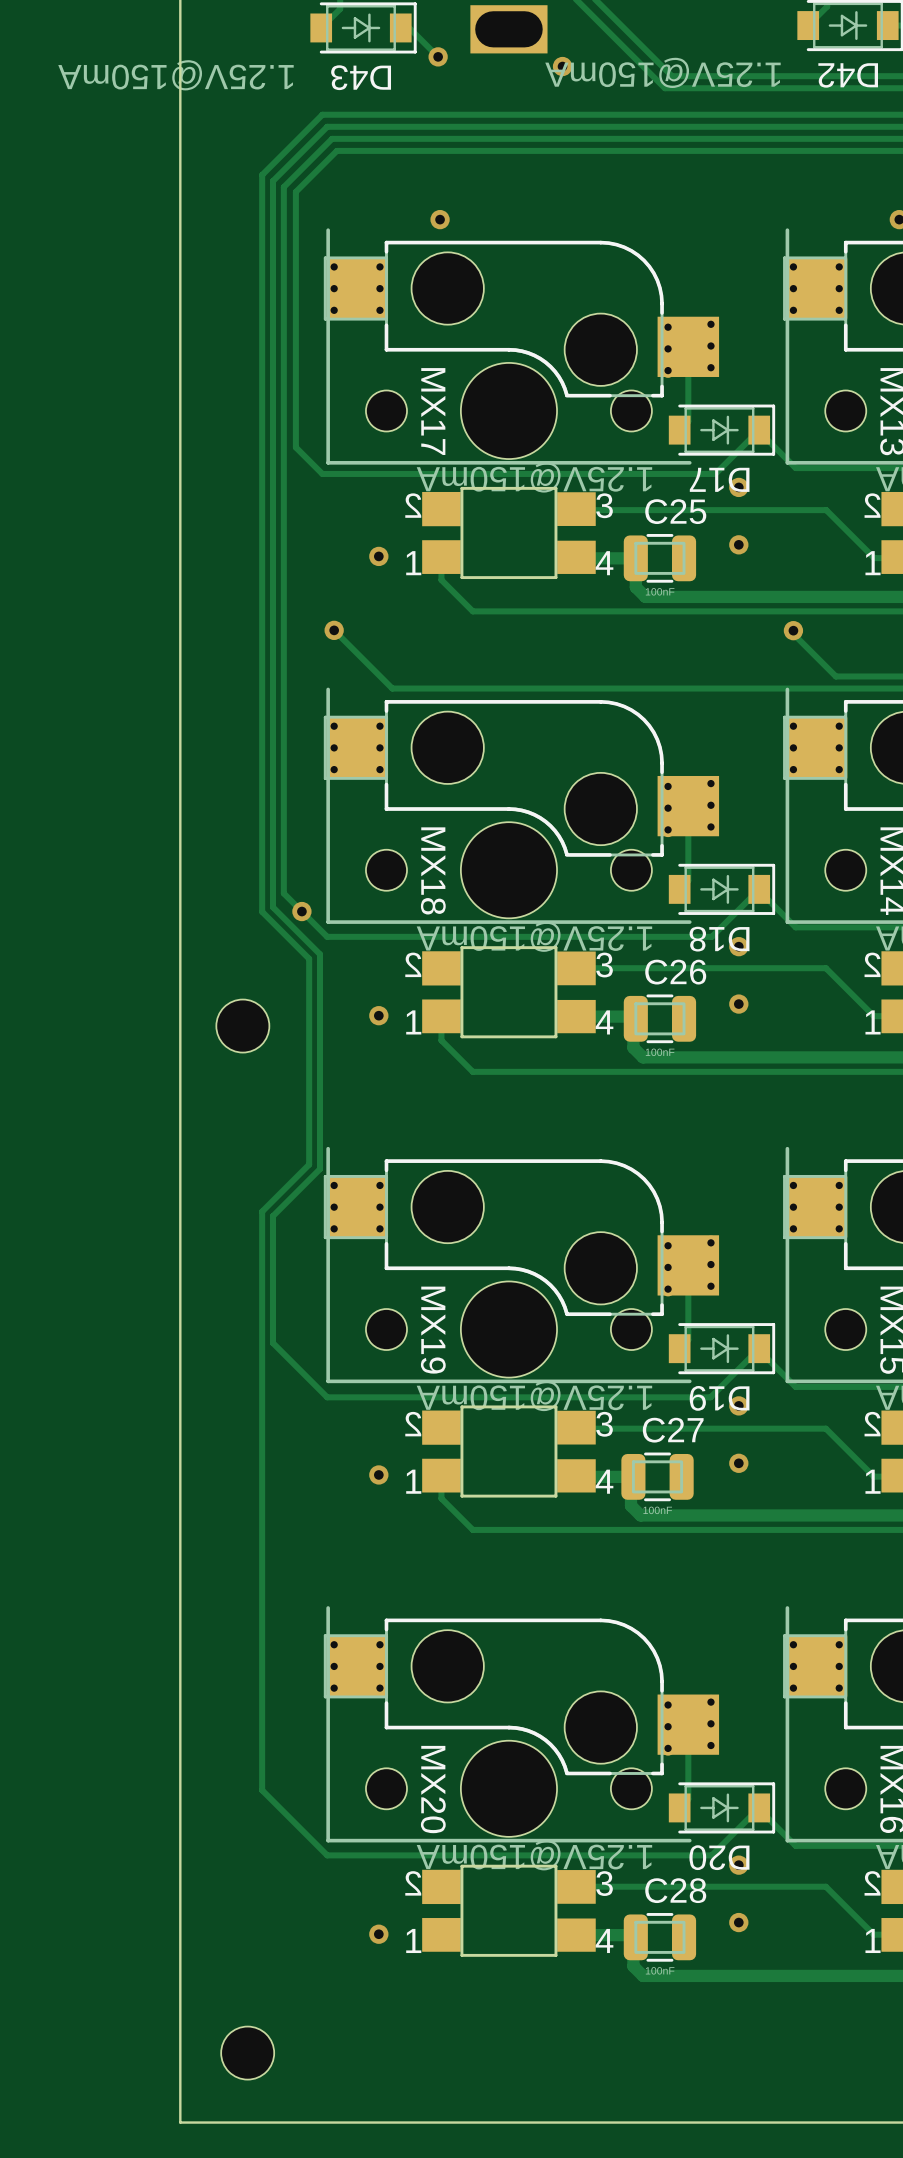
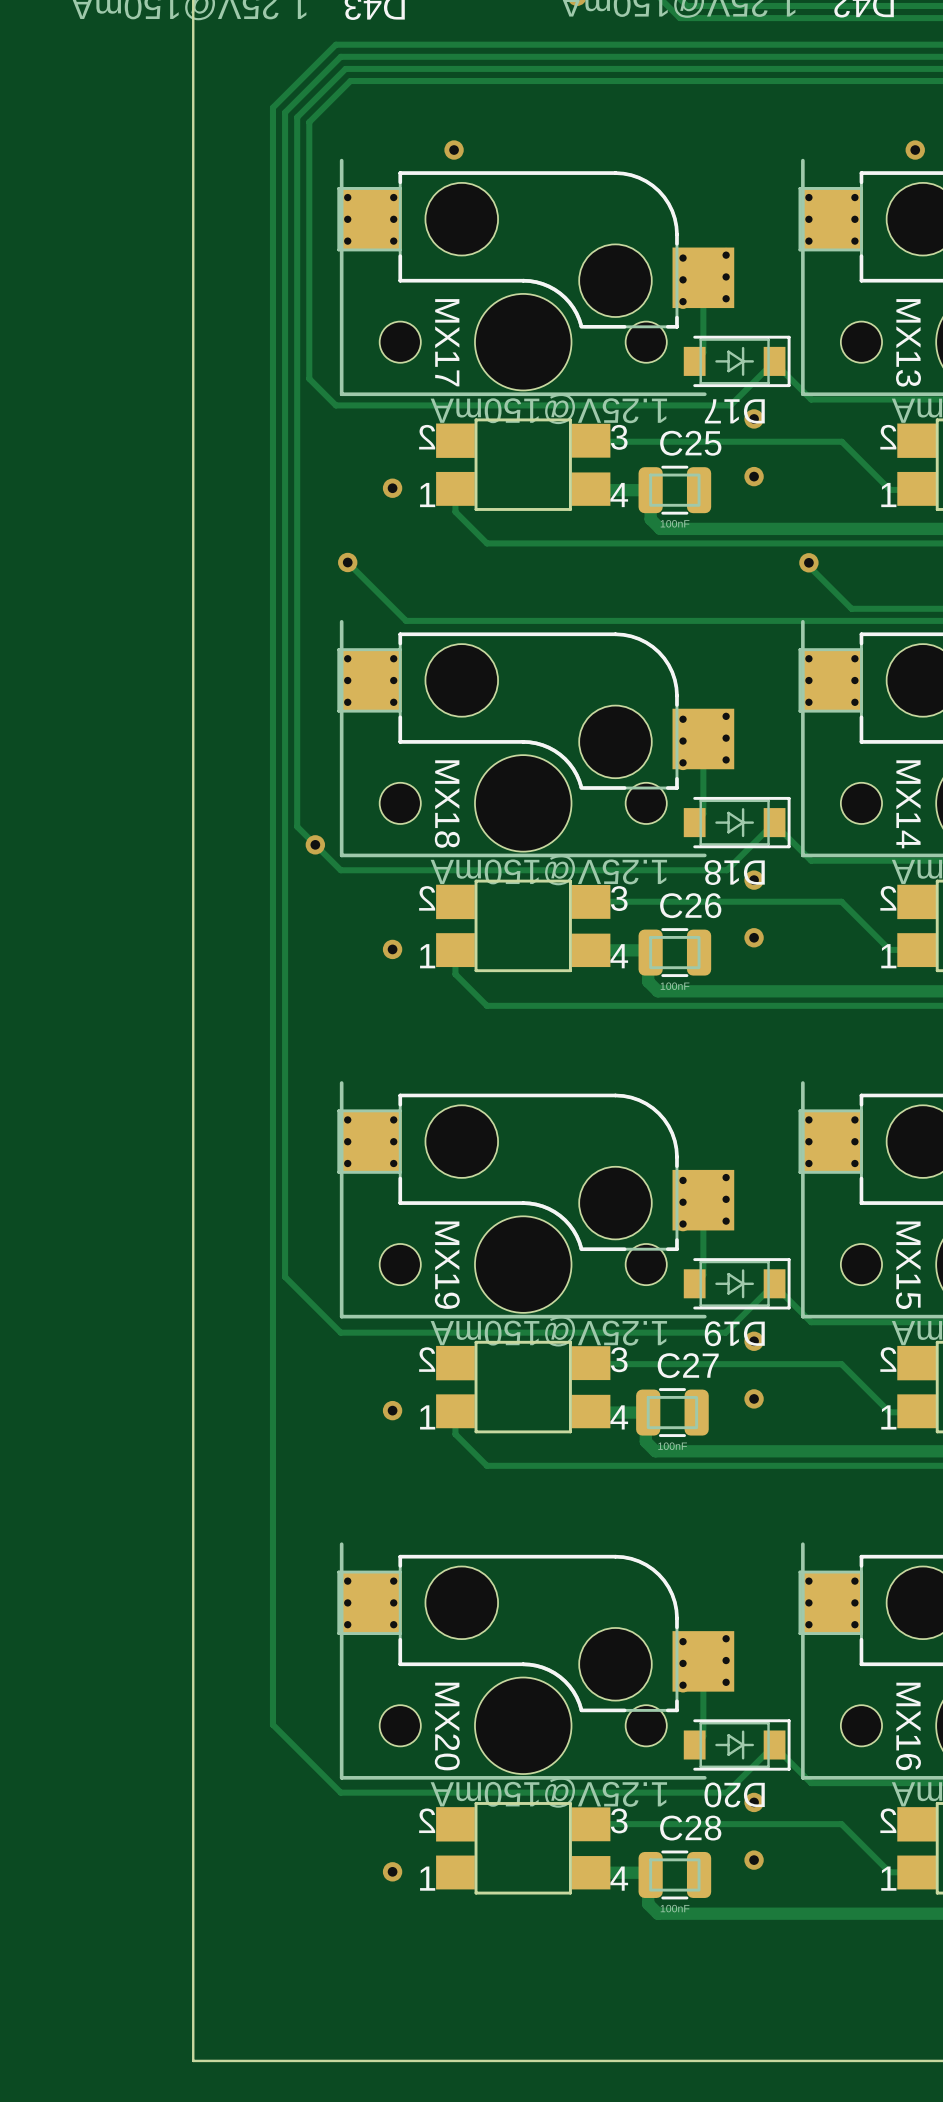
track: (262, 174) (262, 911) (309, 958) (309, 1164) (262, 1211) (262, 1790) -> (275, 105) (272, 107) (272, 1724) (275, 1727)
track: (273, 181) (273, 907) (320, 954) (320, 1169) (272, 1216) (272, 1343) -> (286, 111) (286, 1278)
part: (242, 1026) -> none
part: (247, 2053) -> none

